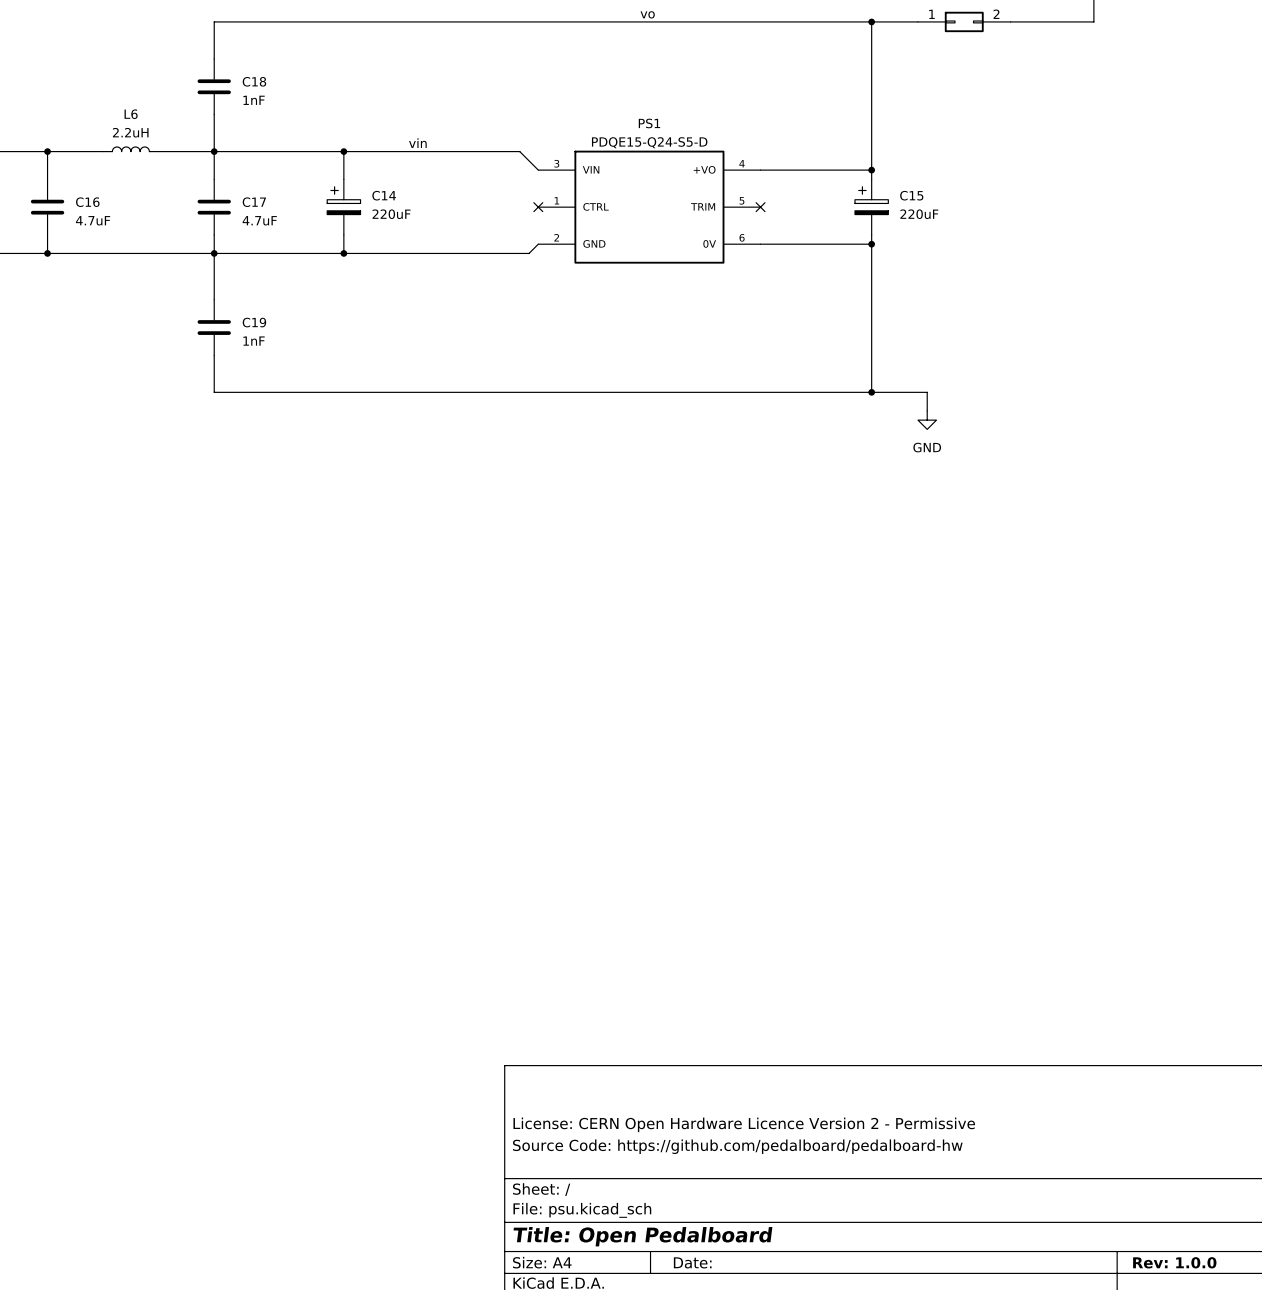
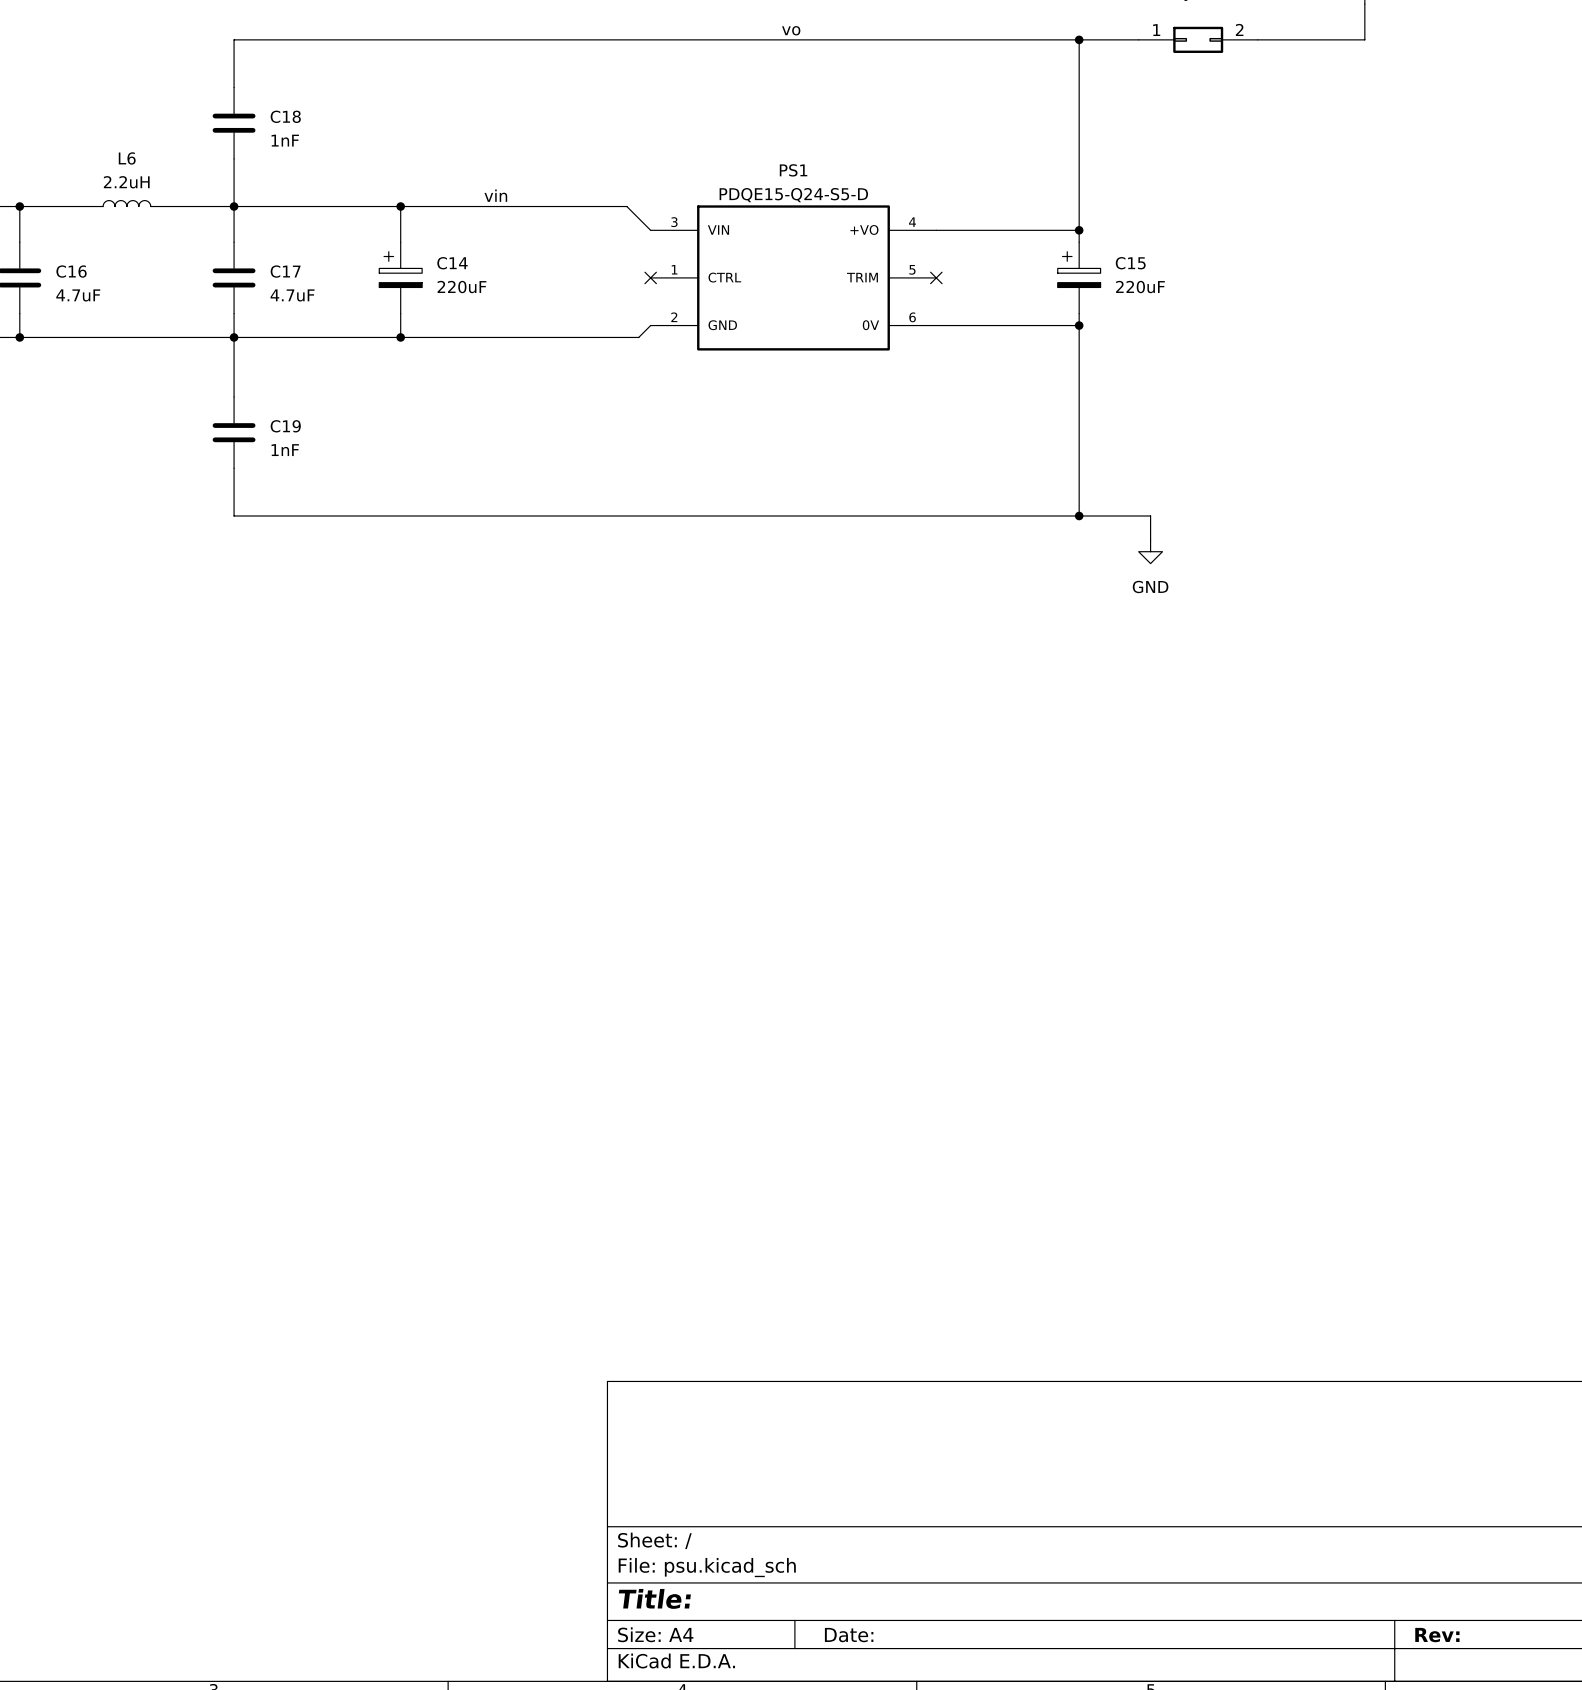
title block: License: CERN Open Hardware Licence Version 2 - Permissive (744, 1124) -> none
title block: Source Code: https://github.com/pedalboard/pedalboard-hw (737, 1146) -> none
title block: Title: Open Pedalboard (642, 1236) -> Title: (654, 1598)
title block: Rev: 1.0.0 (1174, 1262) -> Rev: (1437, 1635)

